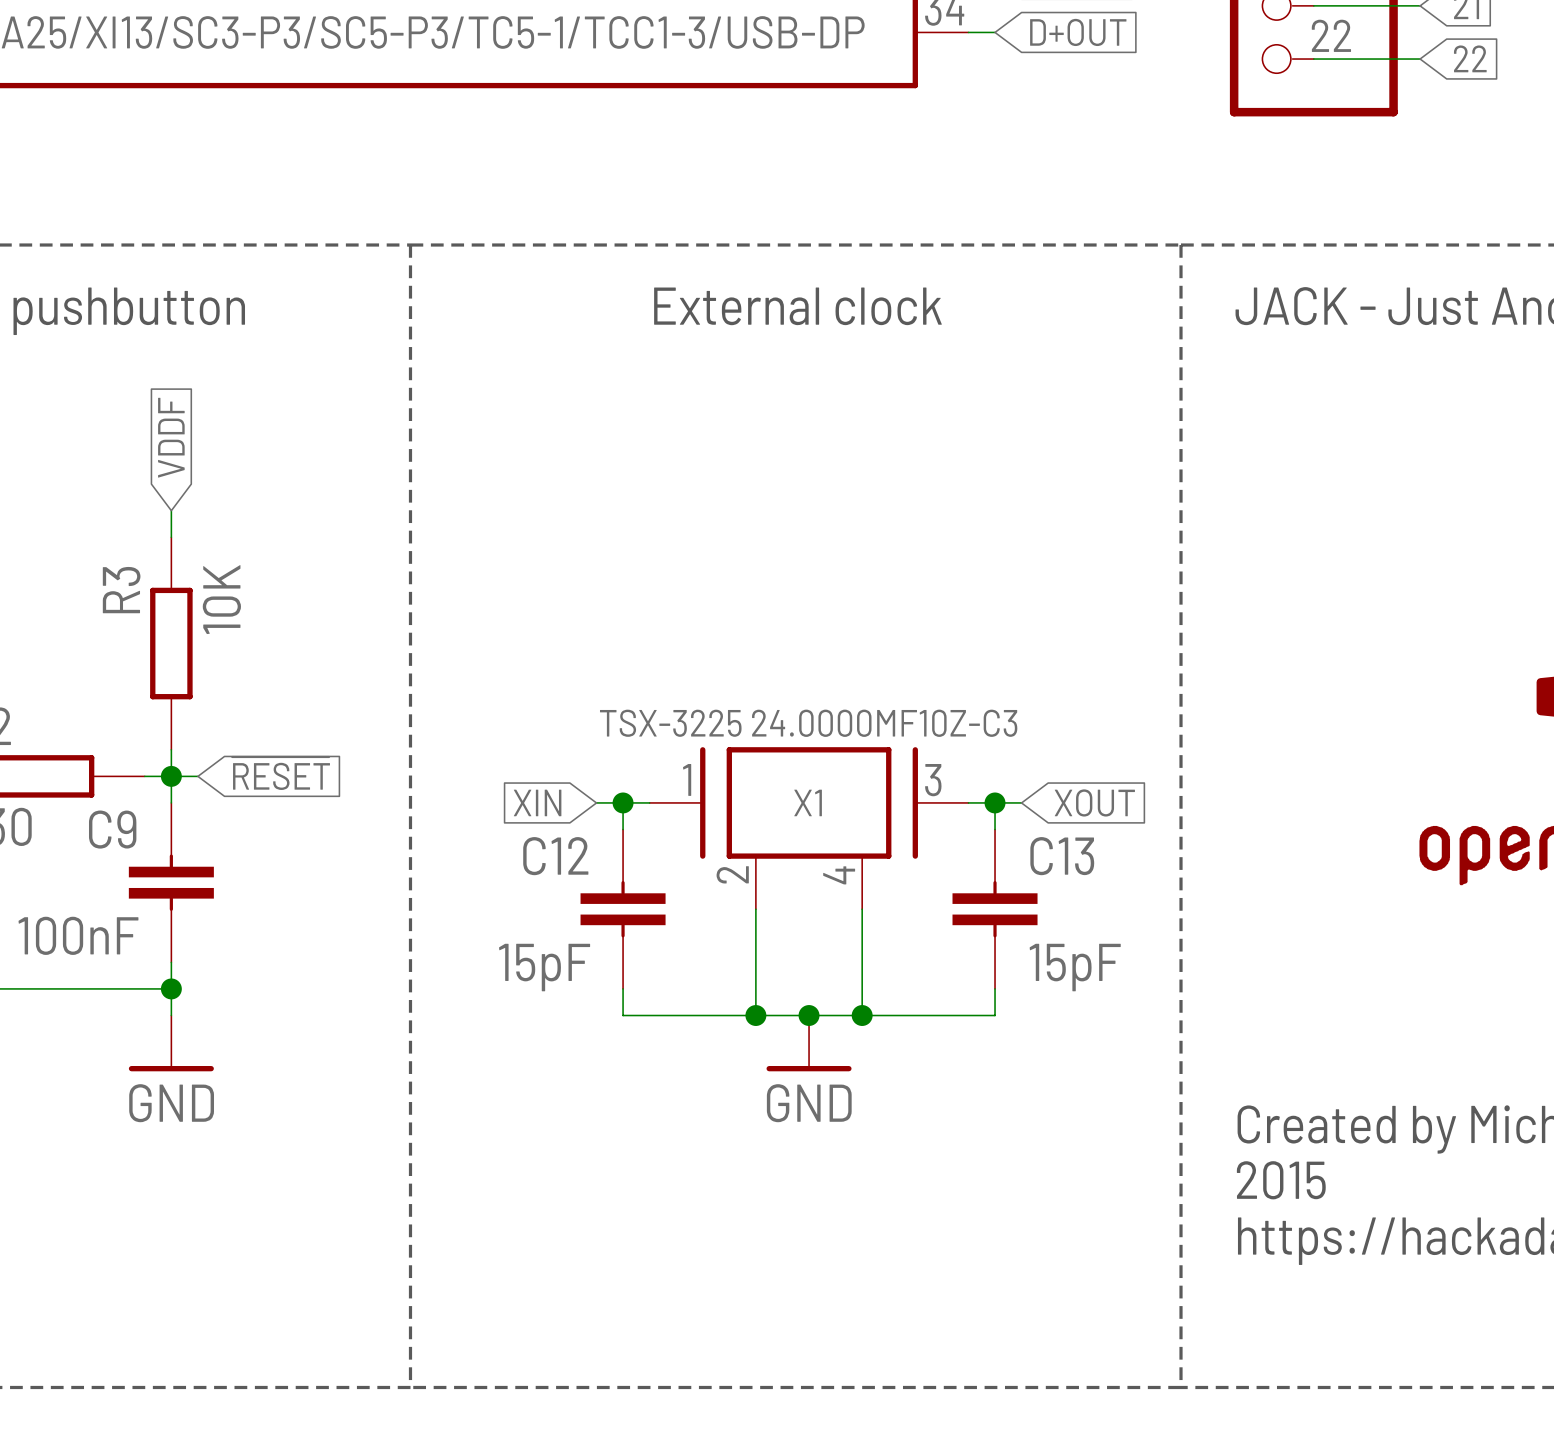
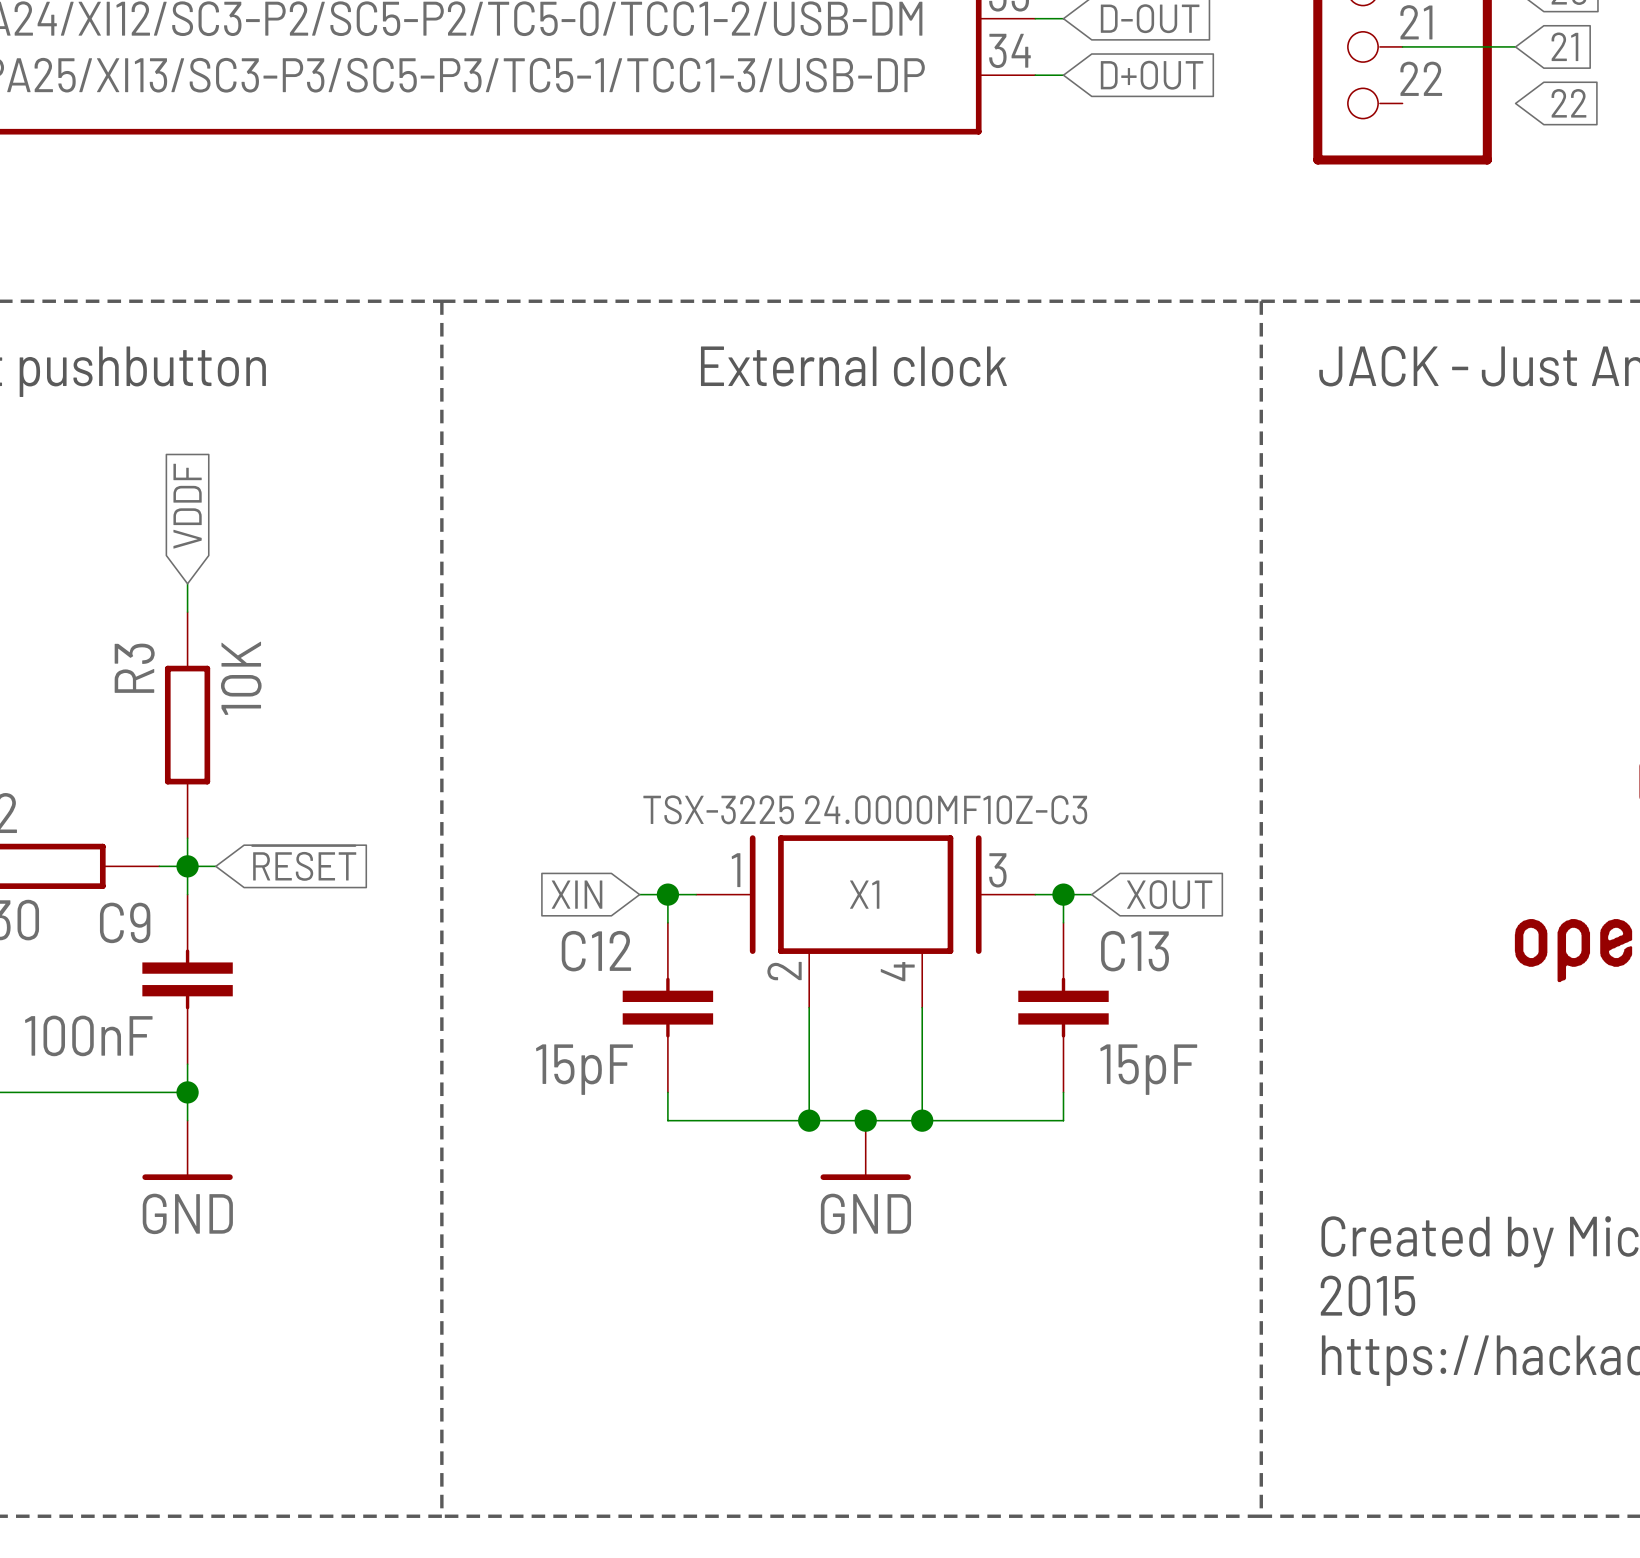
wire: (1313, 59) (1420, 59) -> none

